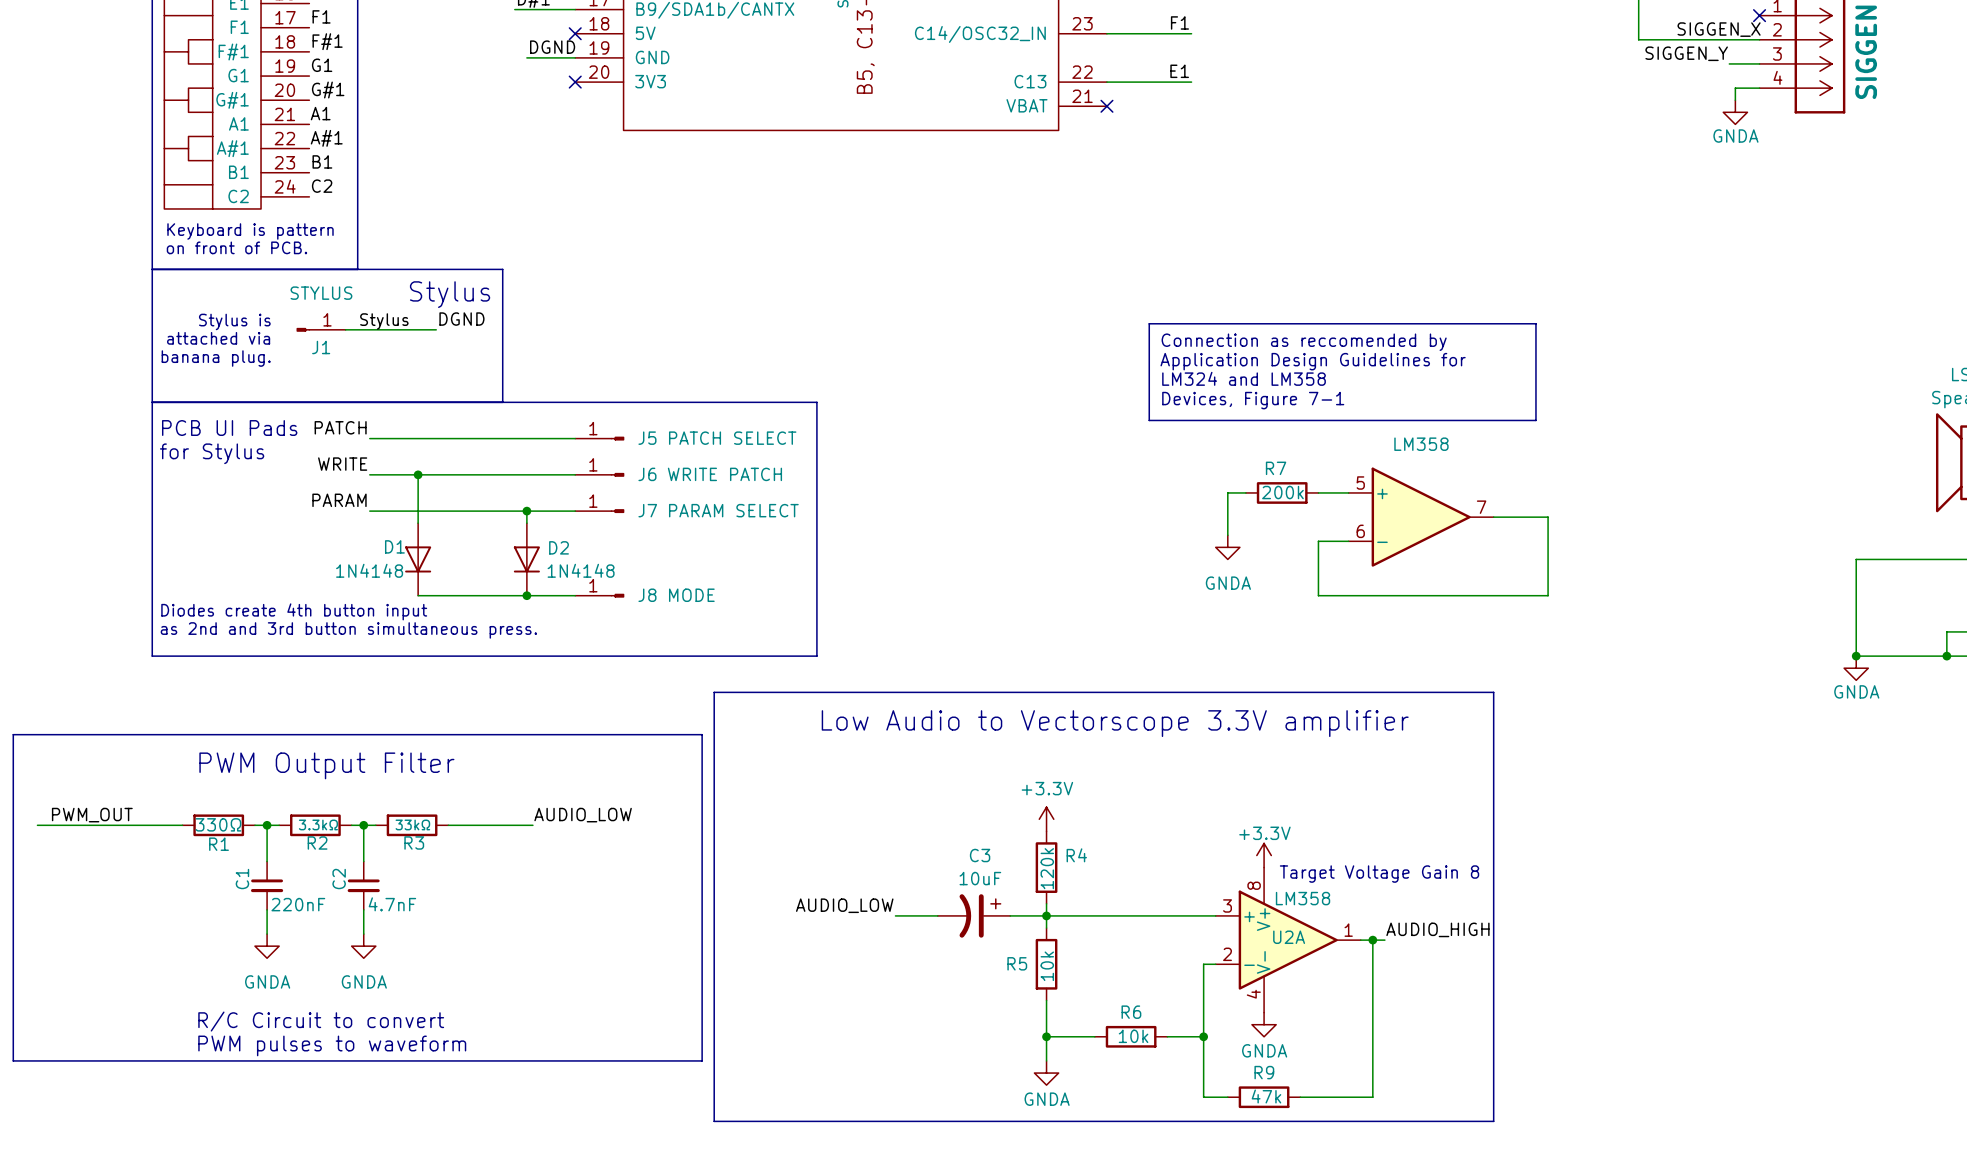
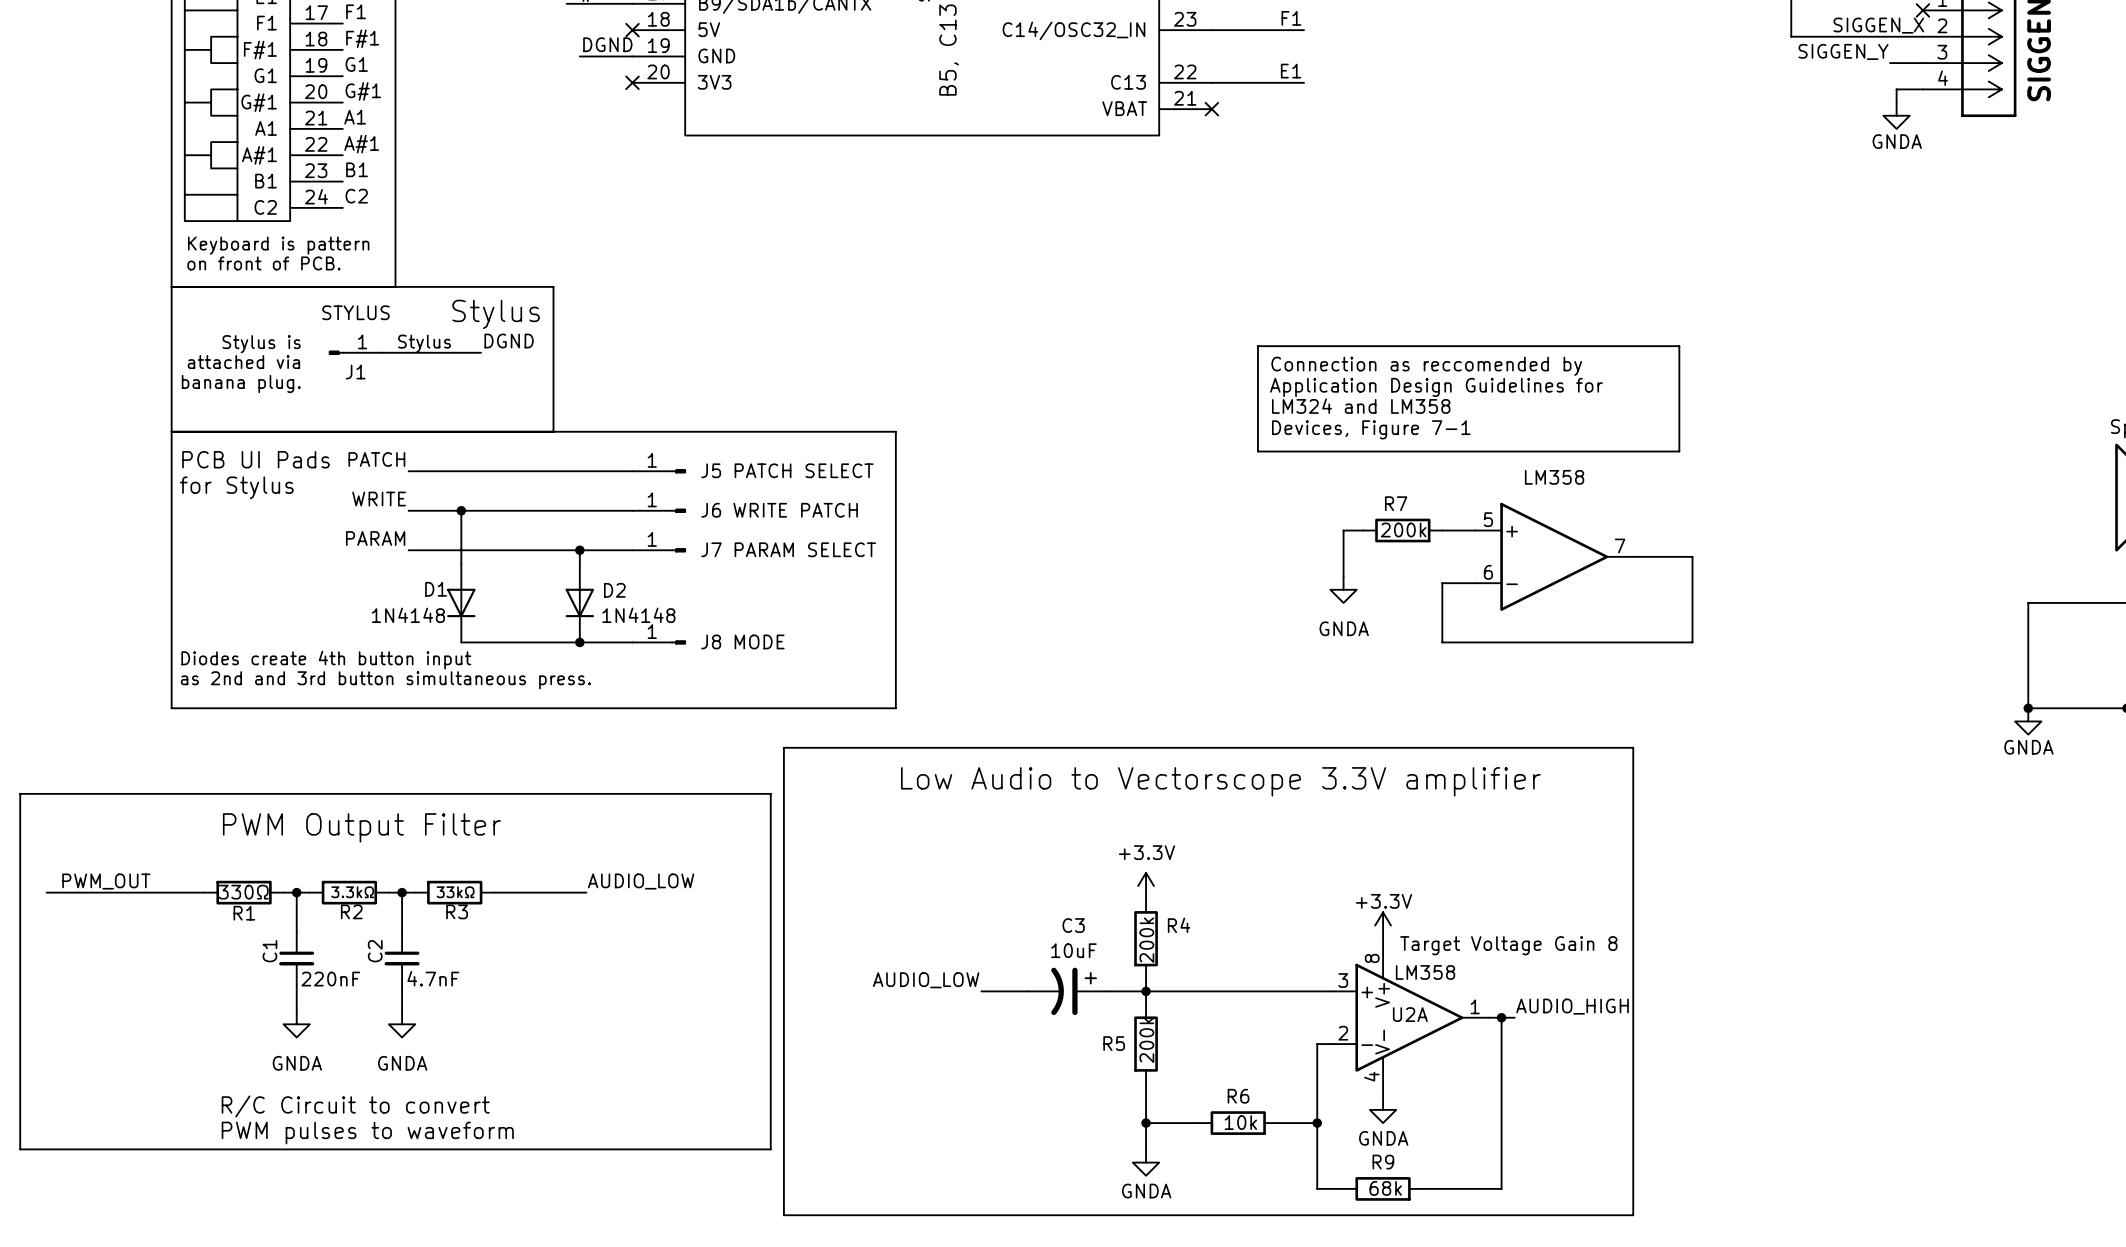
R4 value: 120k (1047, 868) -> 200k (1146, 940)
R5 value: 10k (1047, 966) -> 200k (1146, 1040)
R9 value: 47k (1266, 1096) -> 68k (1385, 1188)

